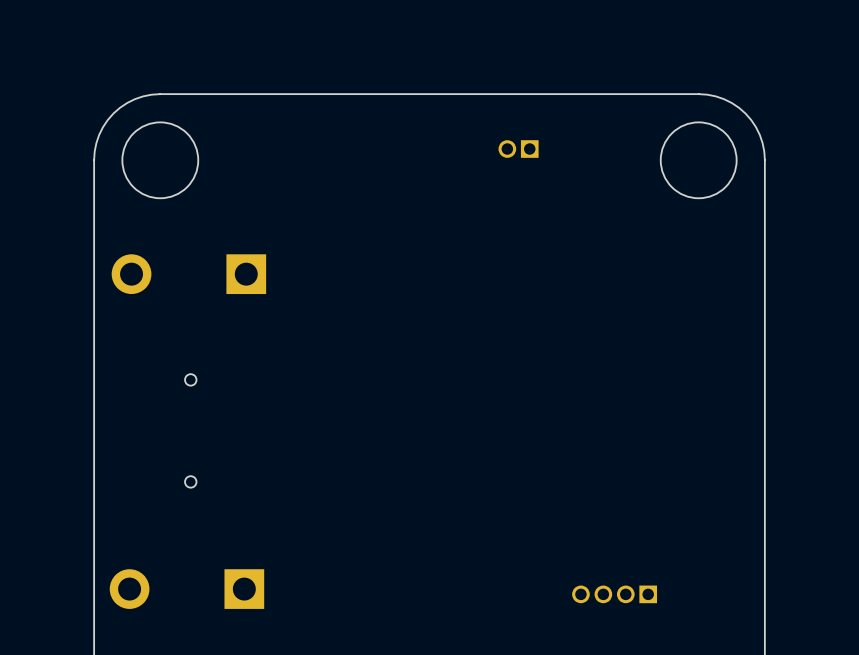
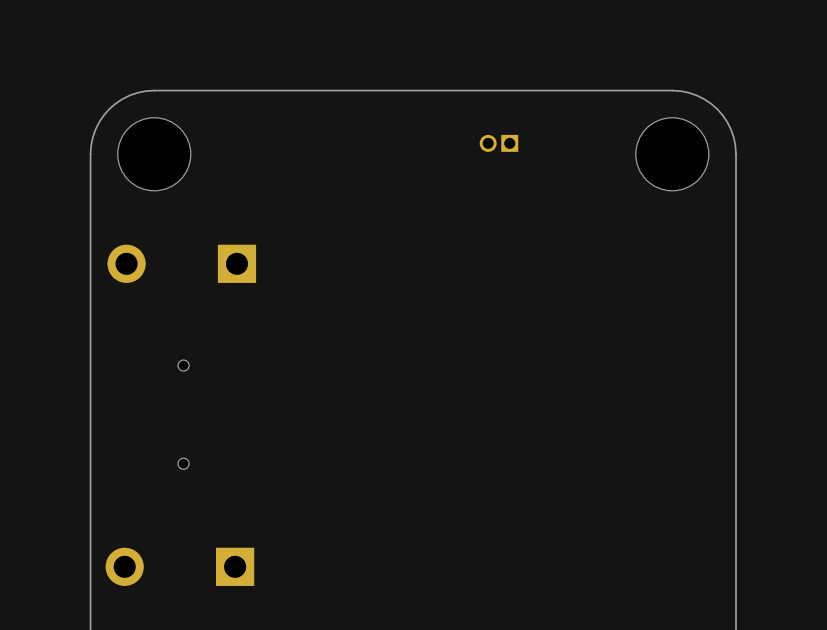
part: (614, 594) -> none

